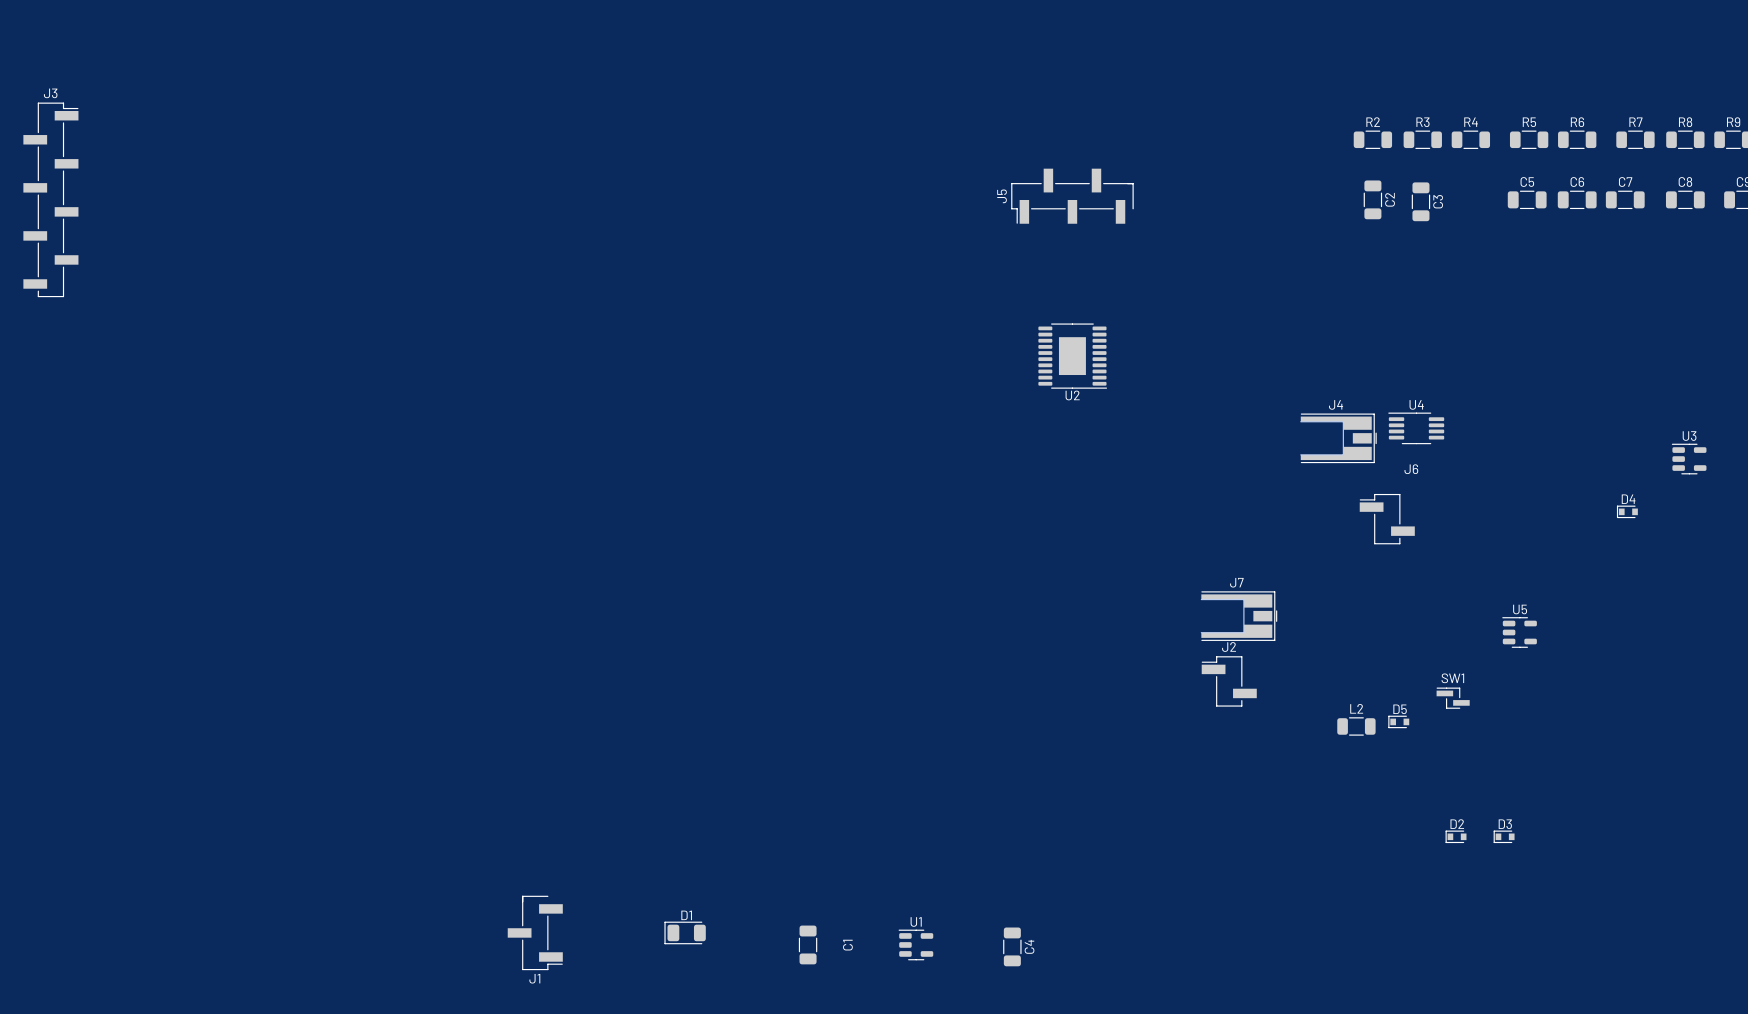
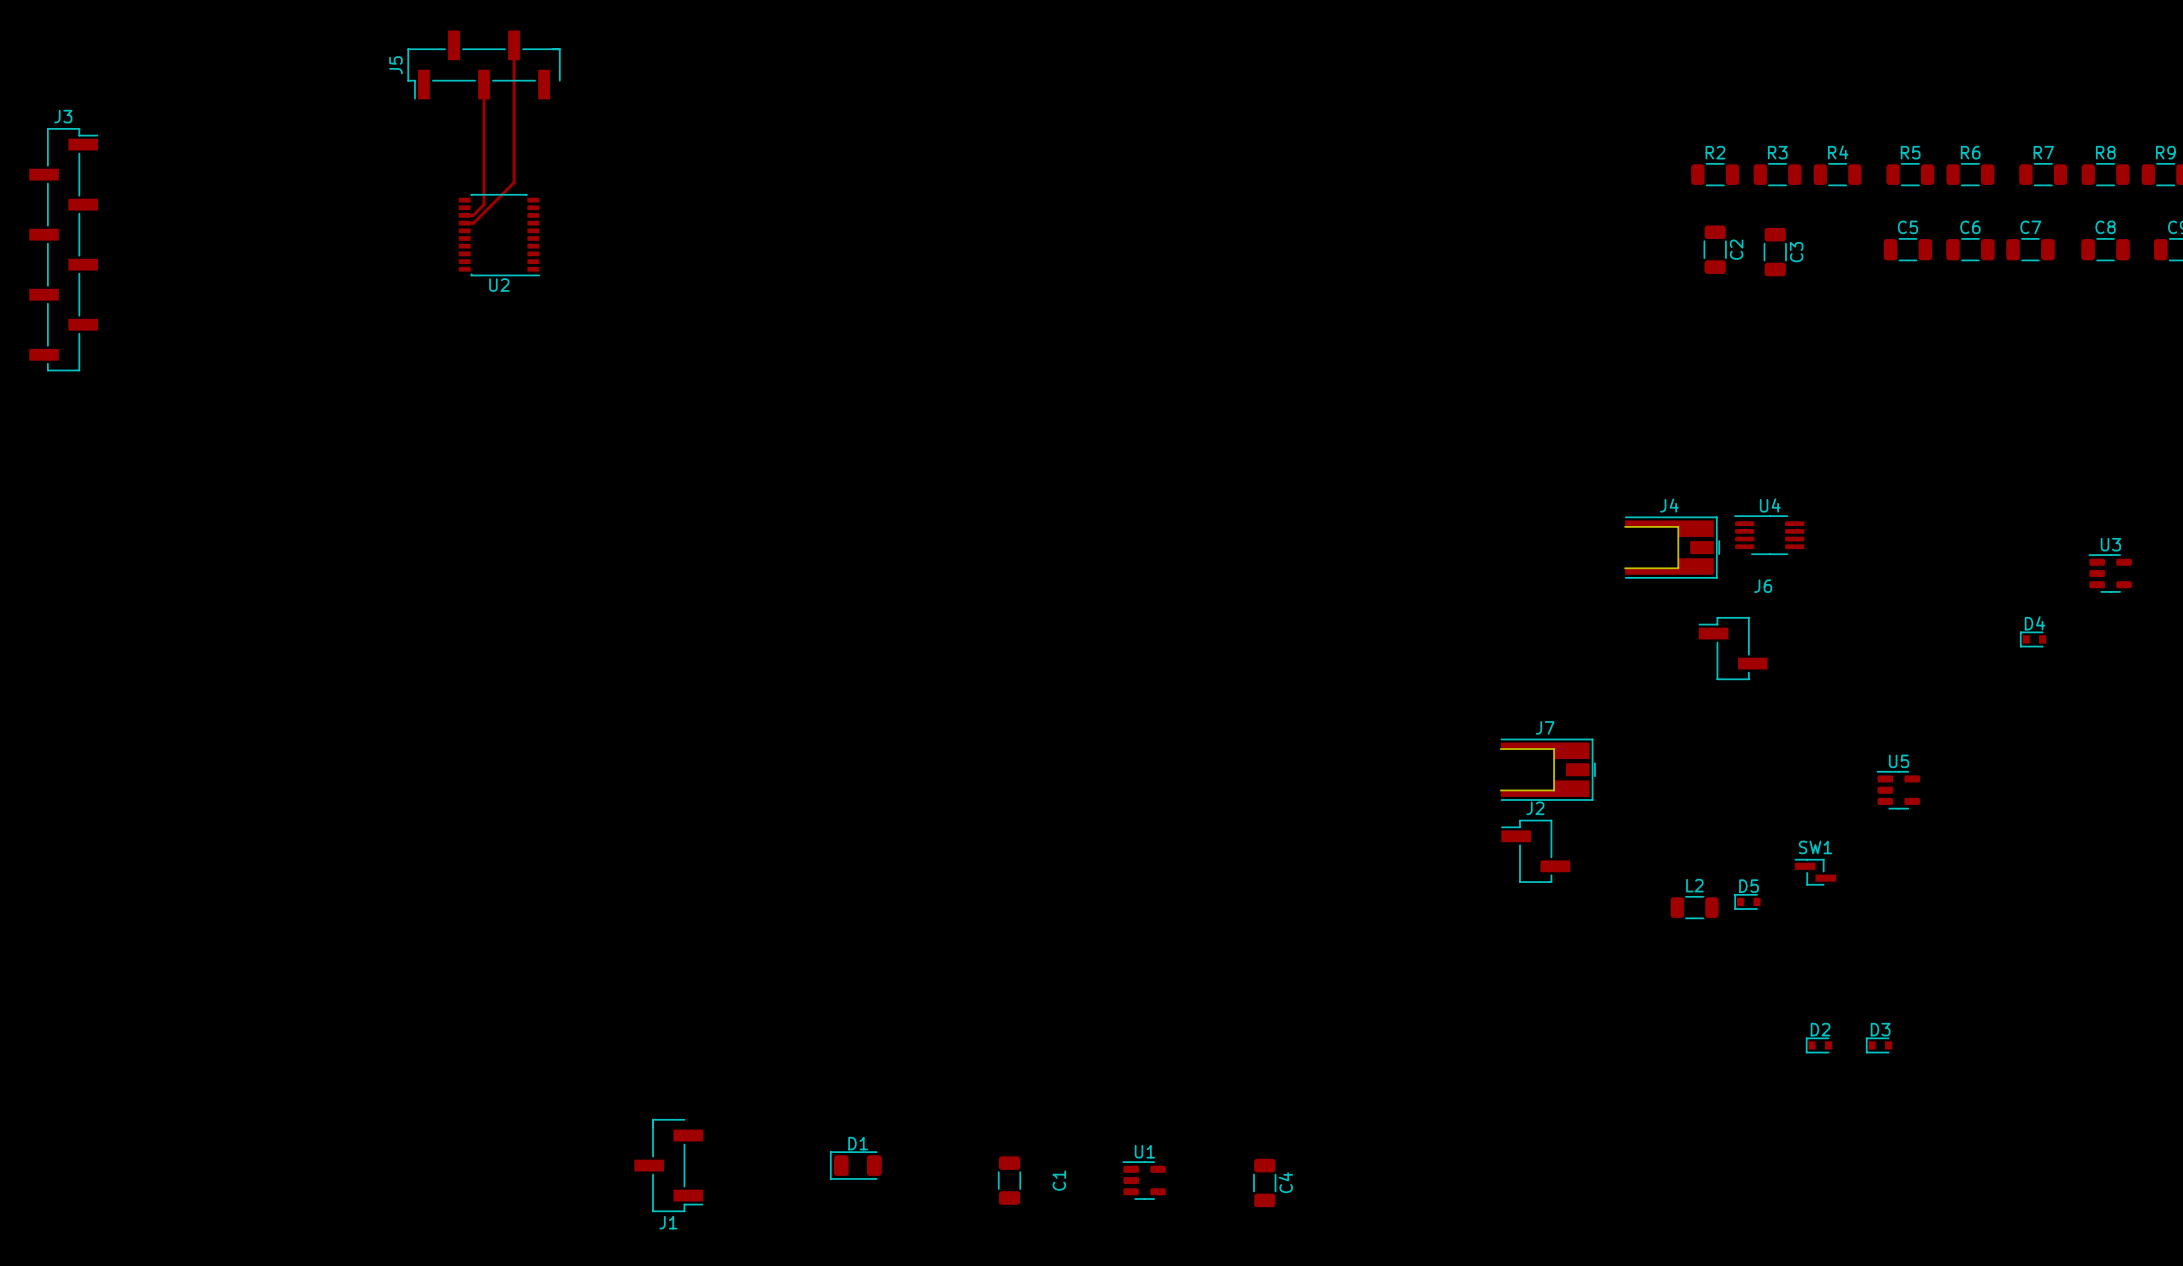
track: none -> (514, 45) (514, 182) (473, 223) (464, 223)
track: none -> (484, 84) (484, 204) (473, 215) (464, 215)
J5 position: (1072, 196) -> (484, 64)
U2 footprint: [1038, 323, 1108, 389] -> [458, 193, 541, 277]

